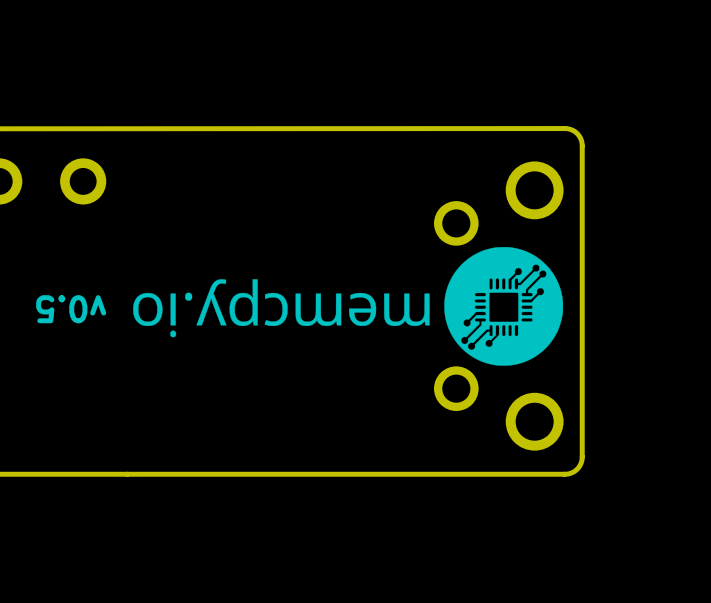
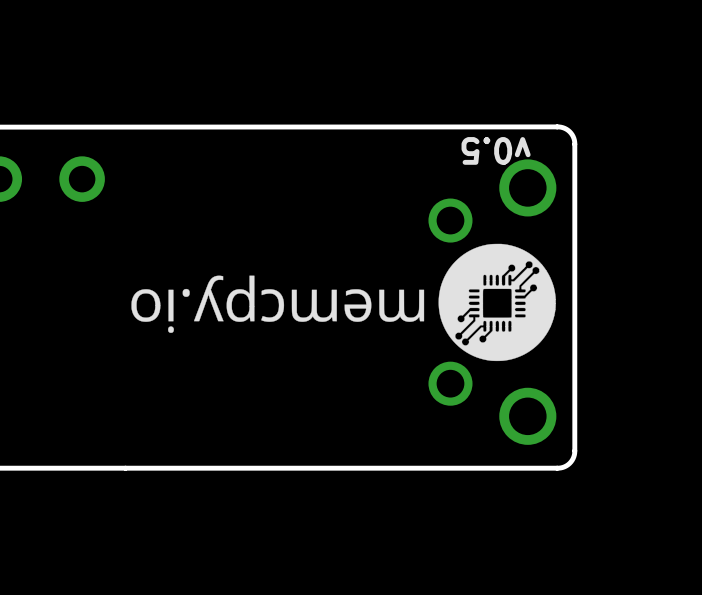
text position: v0.5 (71, 309) -> v0.5 (496, 150)

